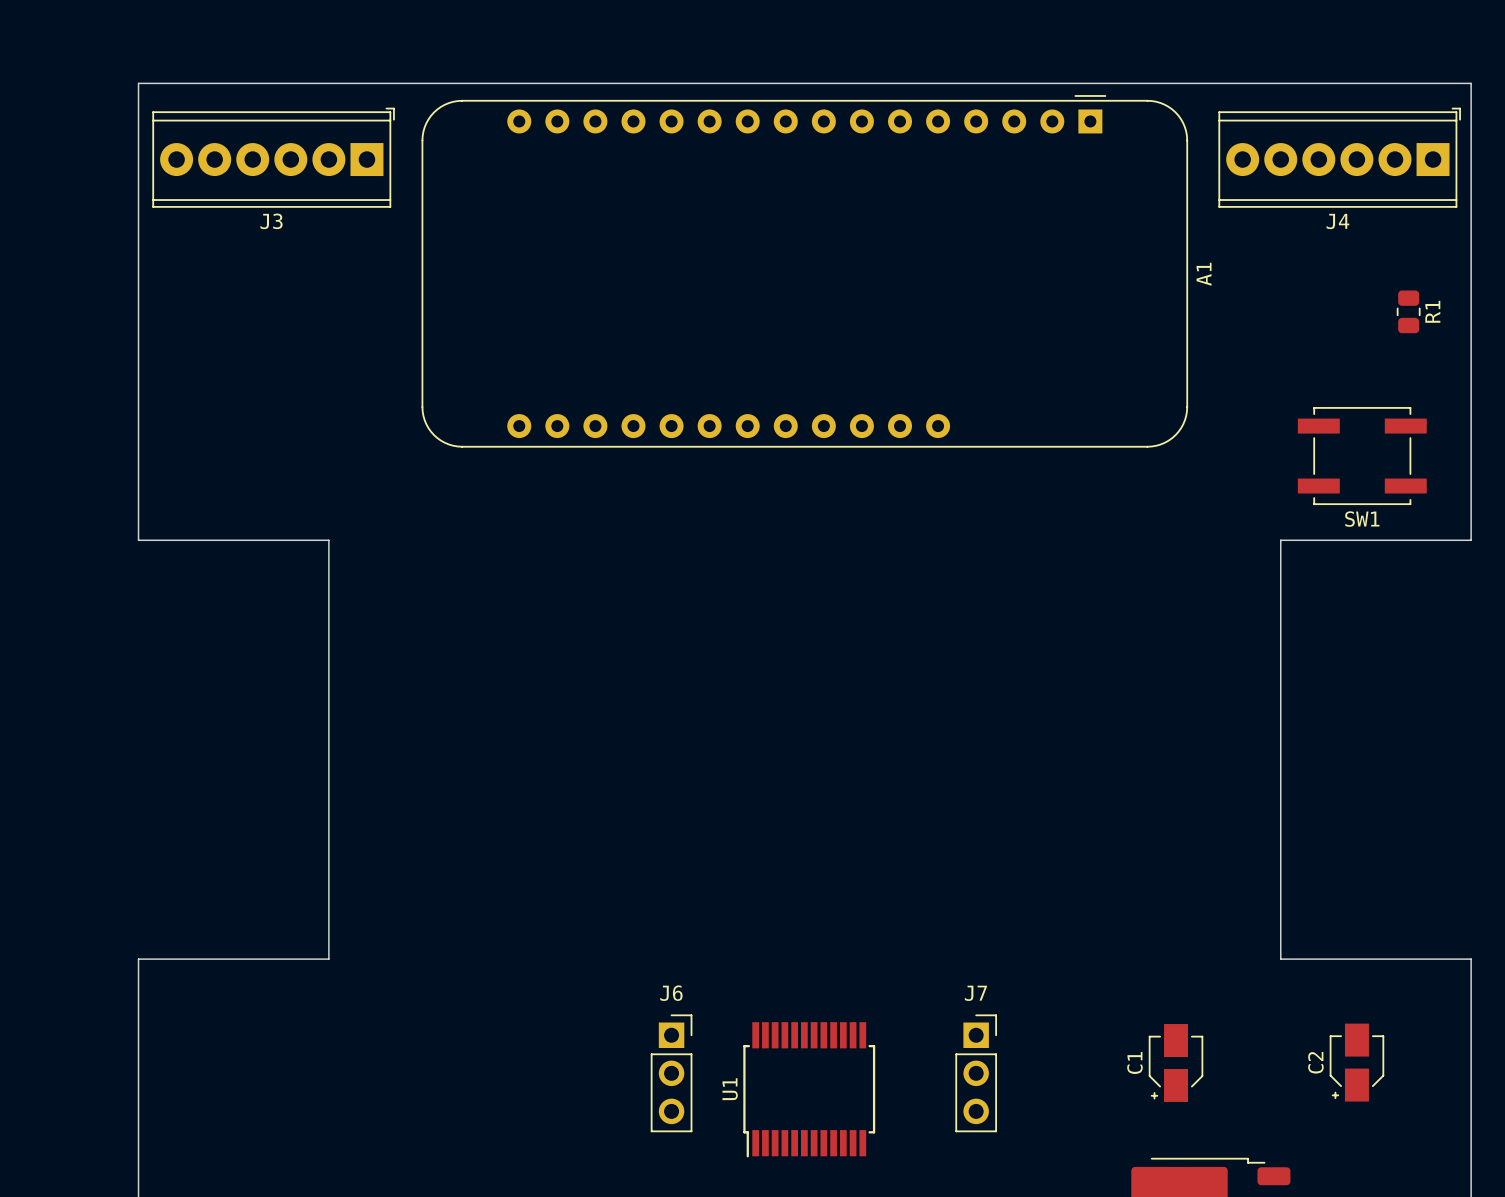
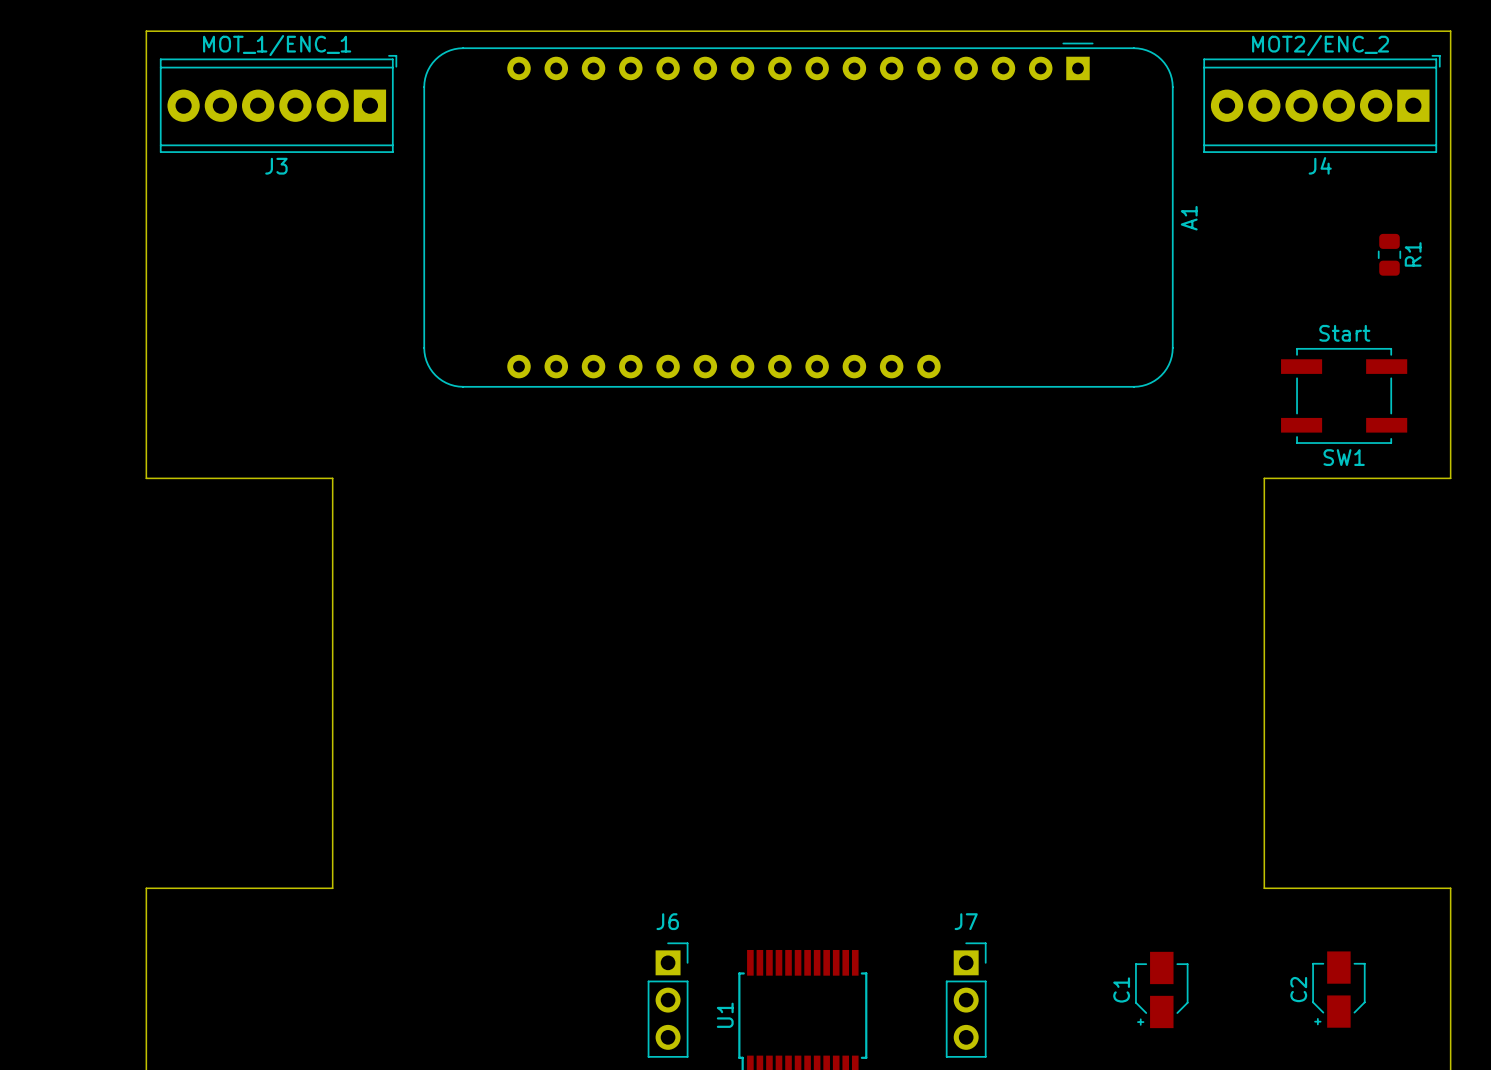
J3 value: none -> MOT_1/ENC_1 (277, 45)
J4 value: none -> MOT2/ENC_2 (1320, 45)
SW1 value: none -> Start (1344, 333)

